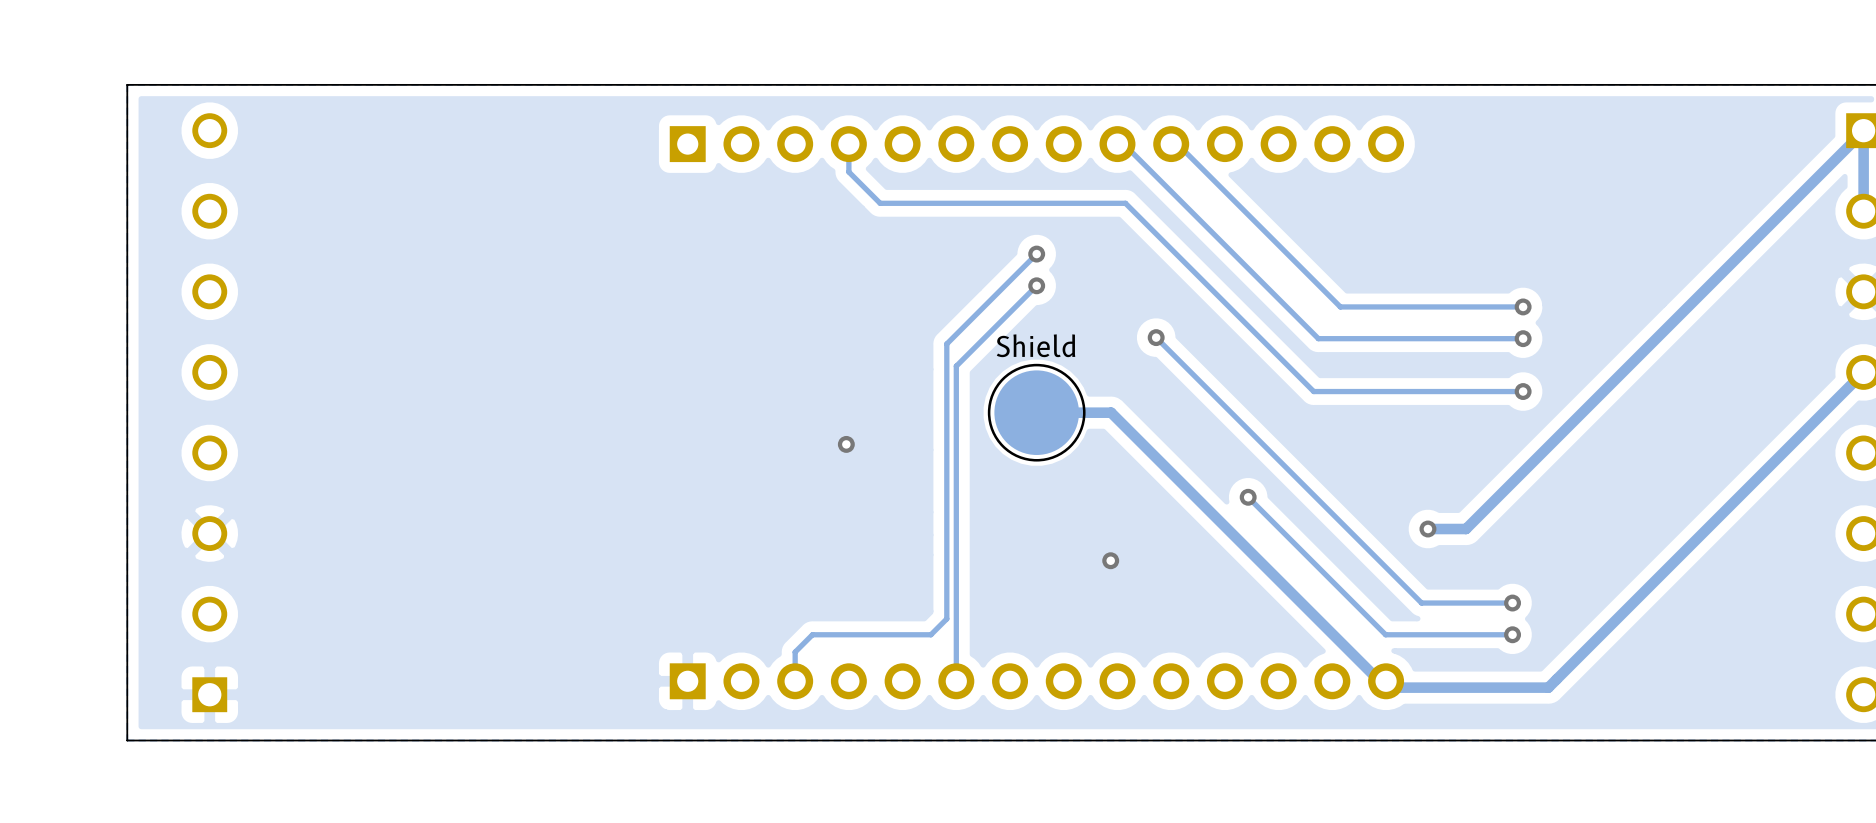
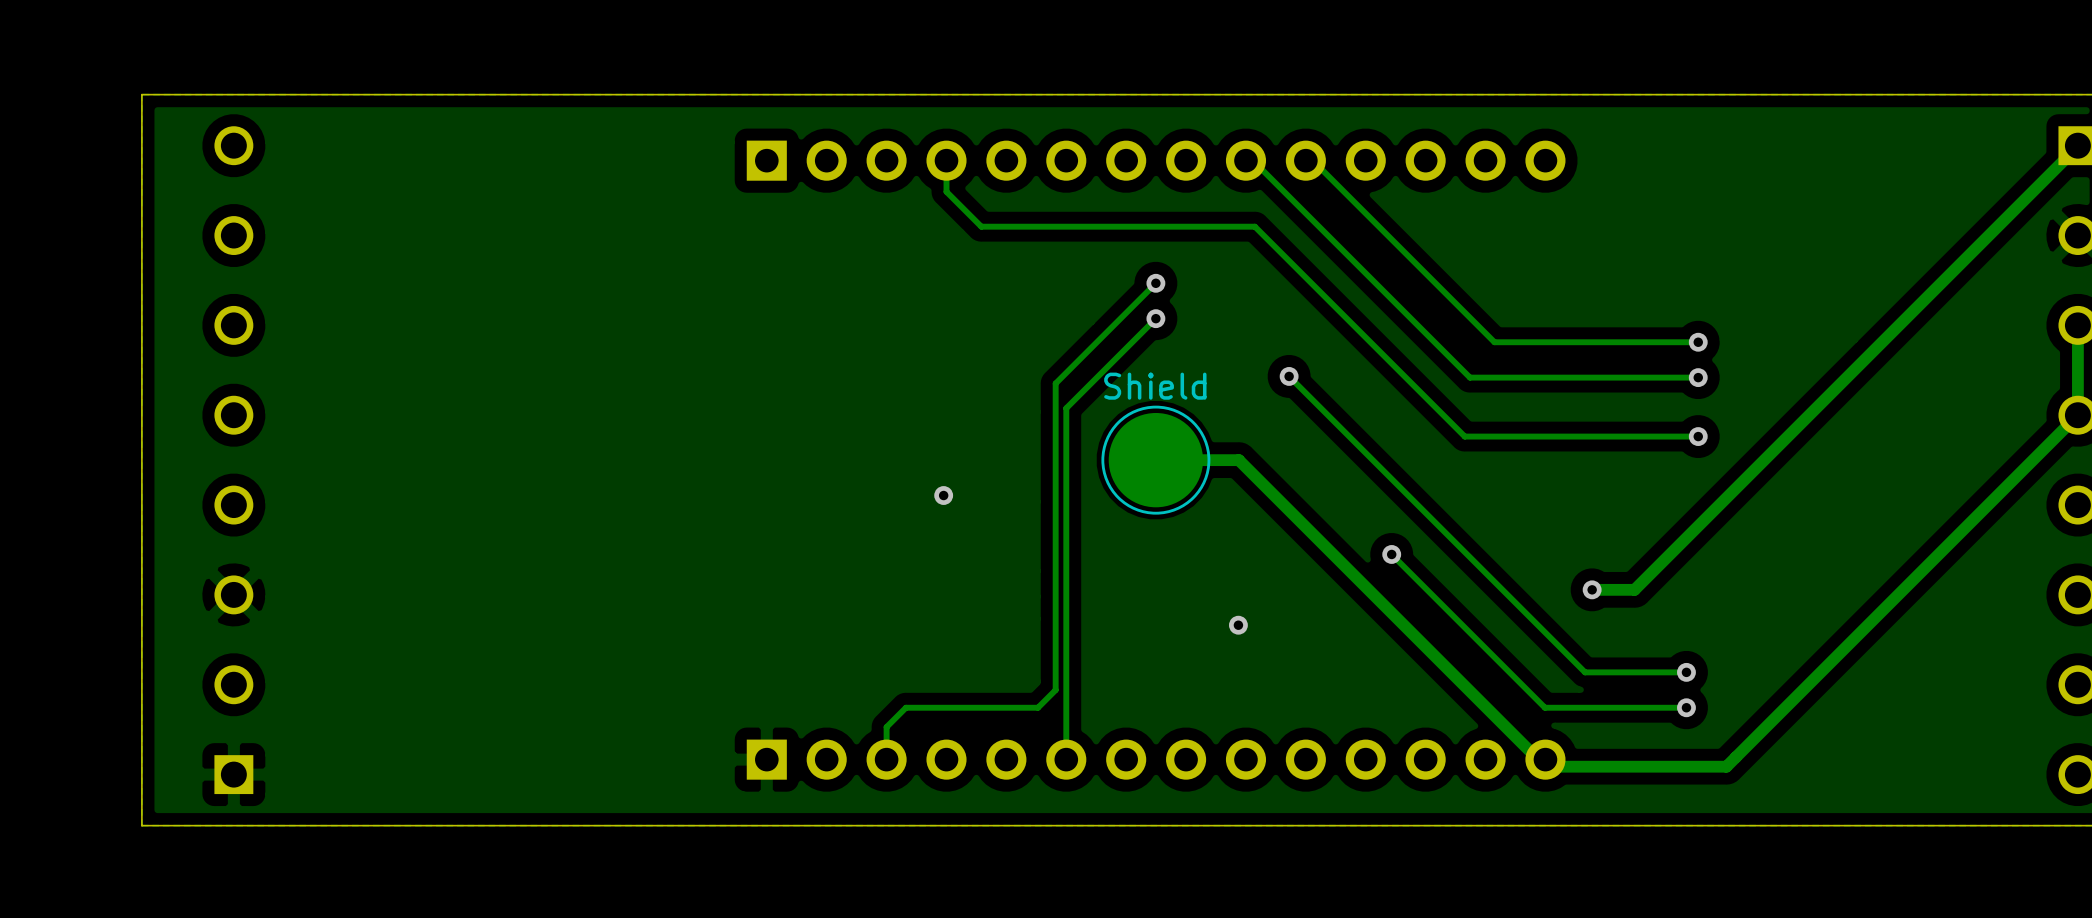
track: (1863, 131) (1863, 211) -> none
track: none -> (2077, 325) (2077, 415)

